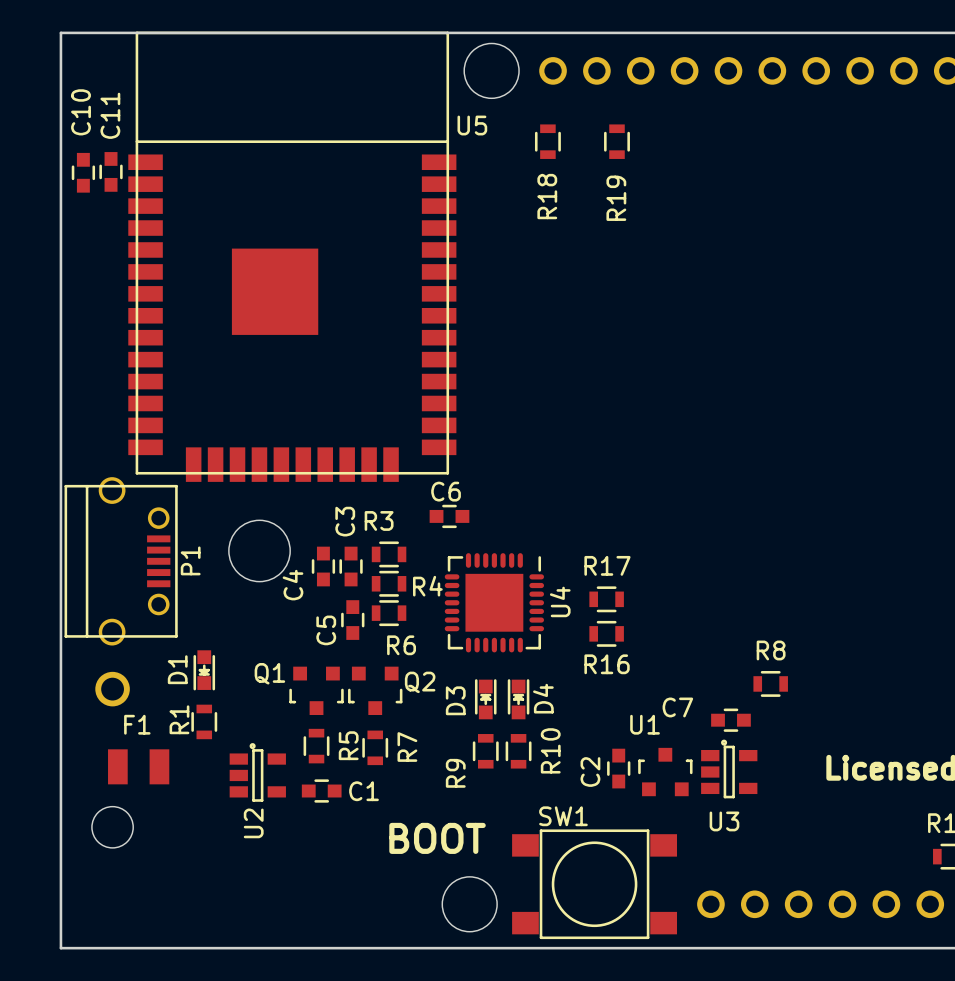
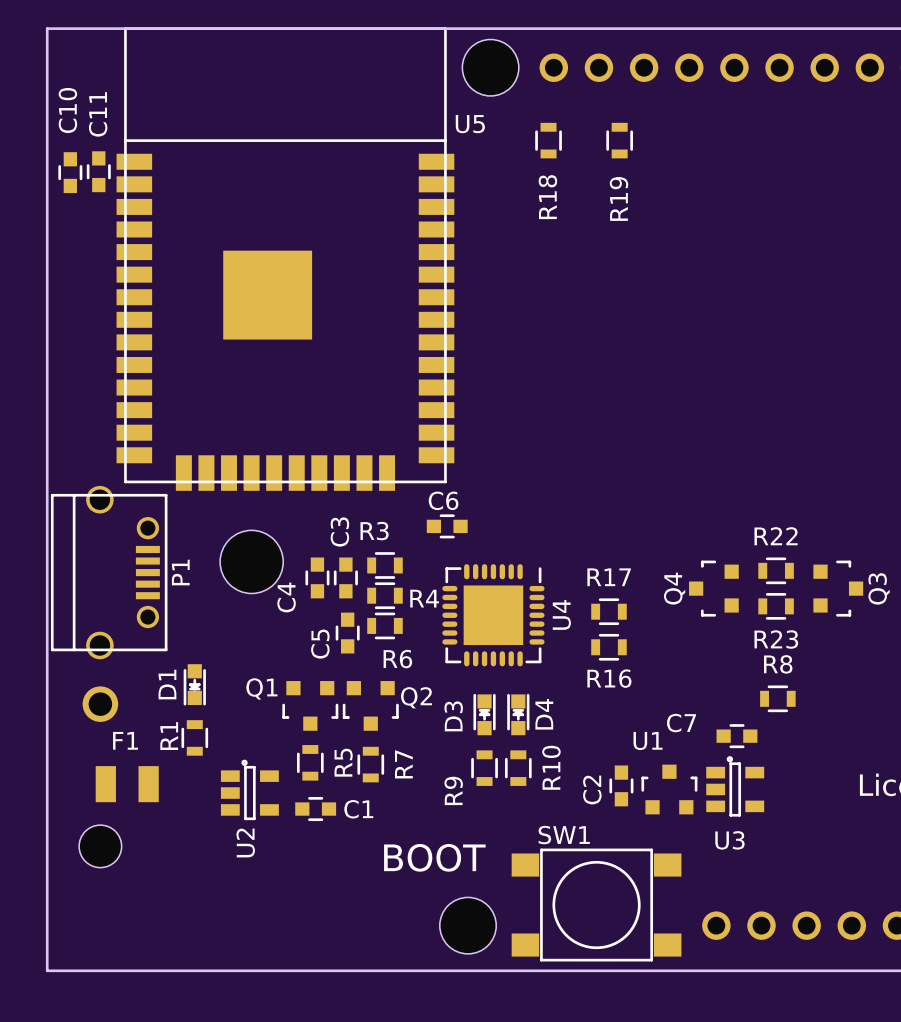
R22: none -> (776, 570)
Q4: none -> (713, 588)
Q3: none -> (838, 588)
R23: none -> (776, 606)

